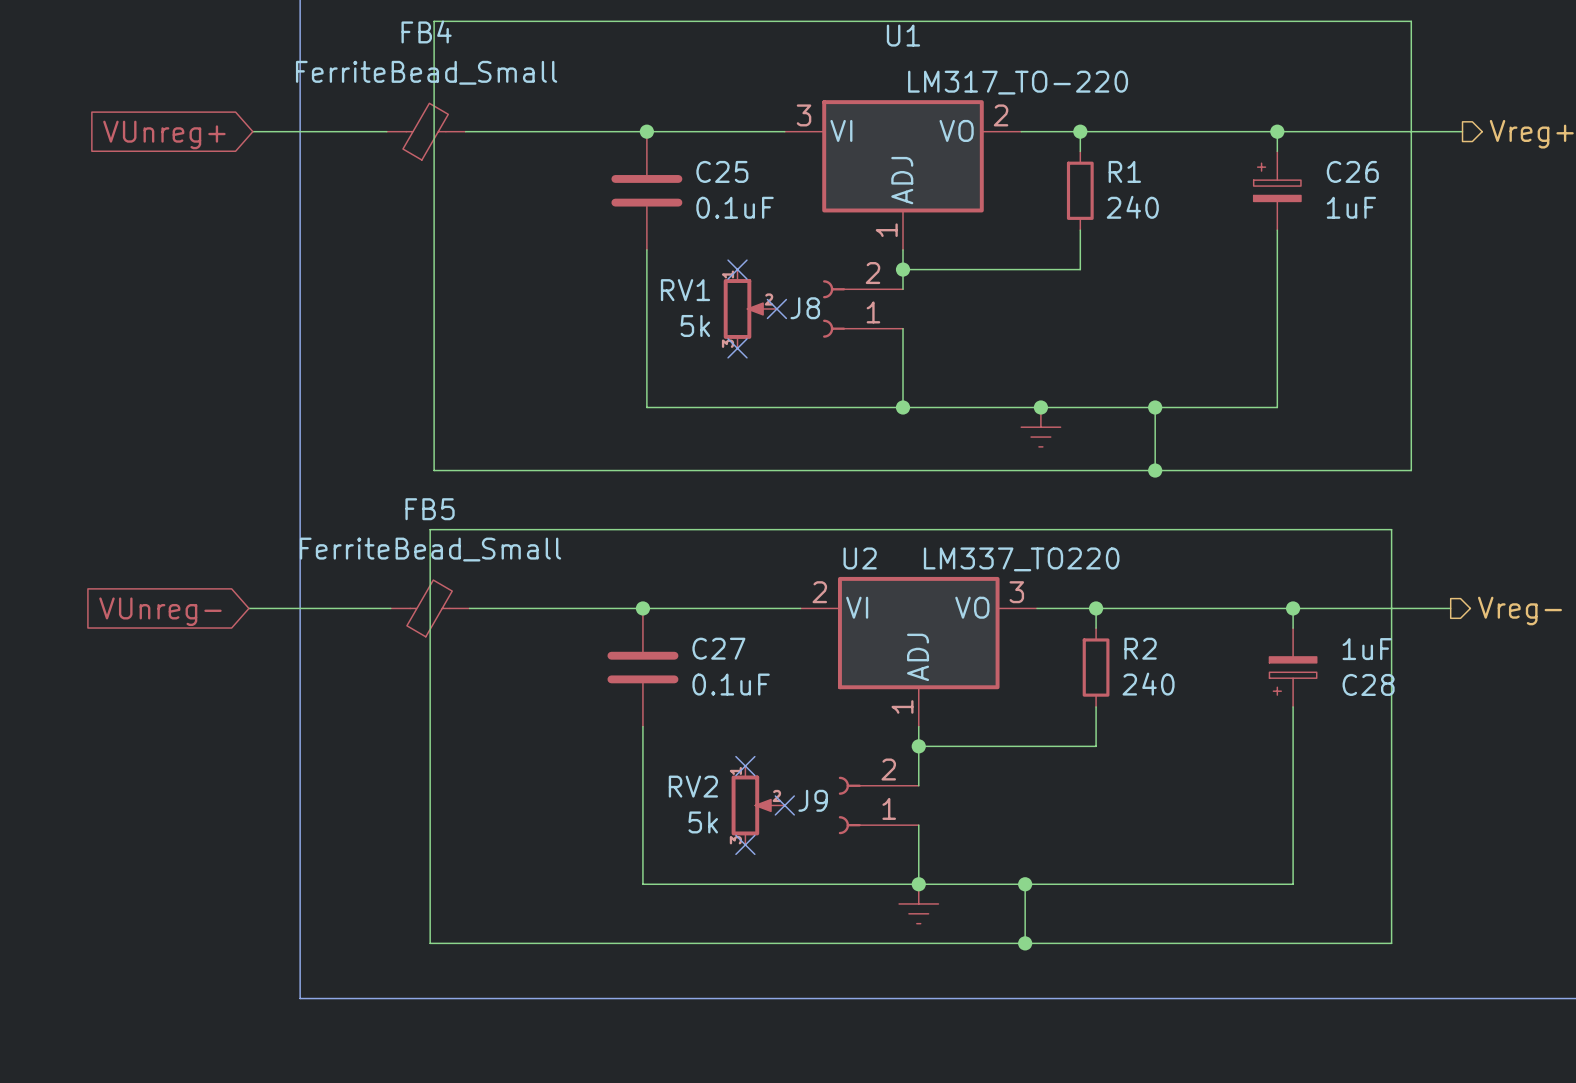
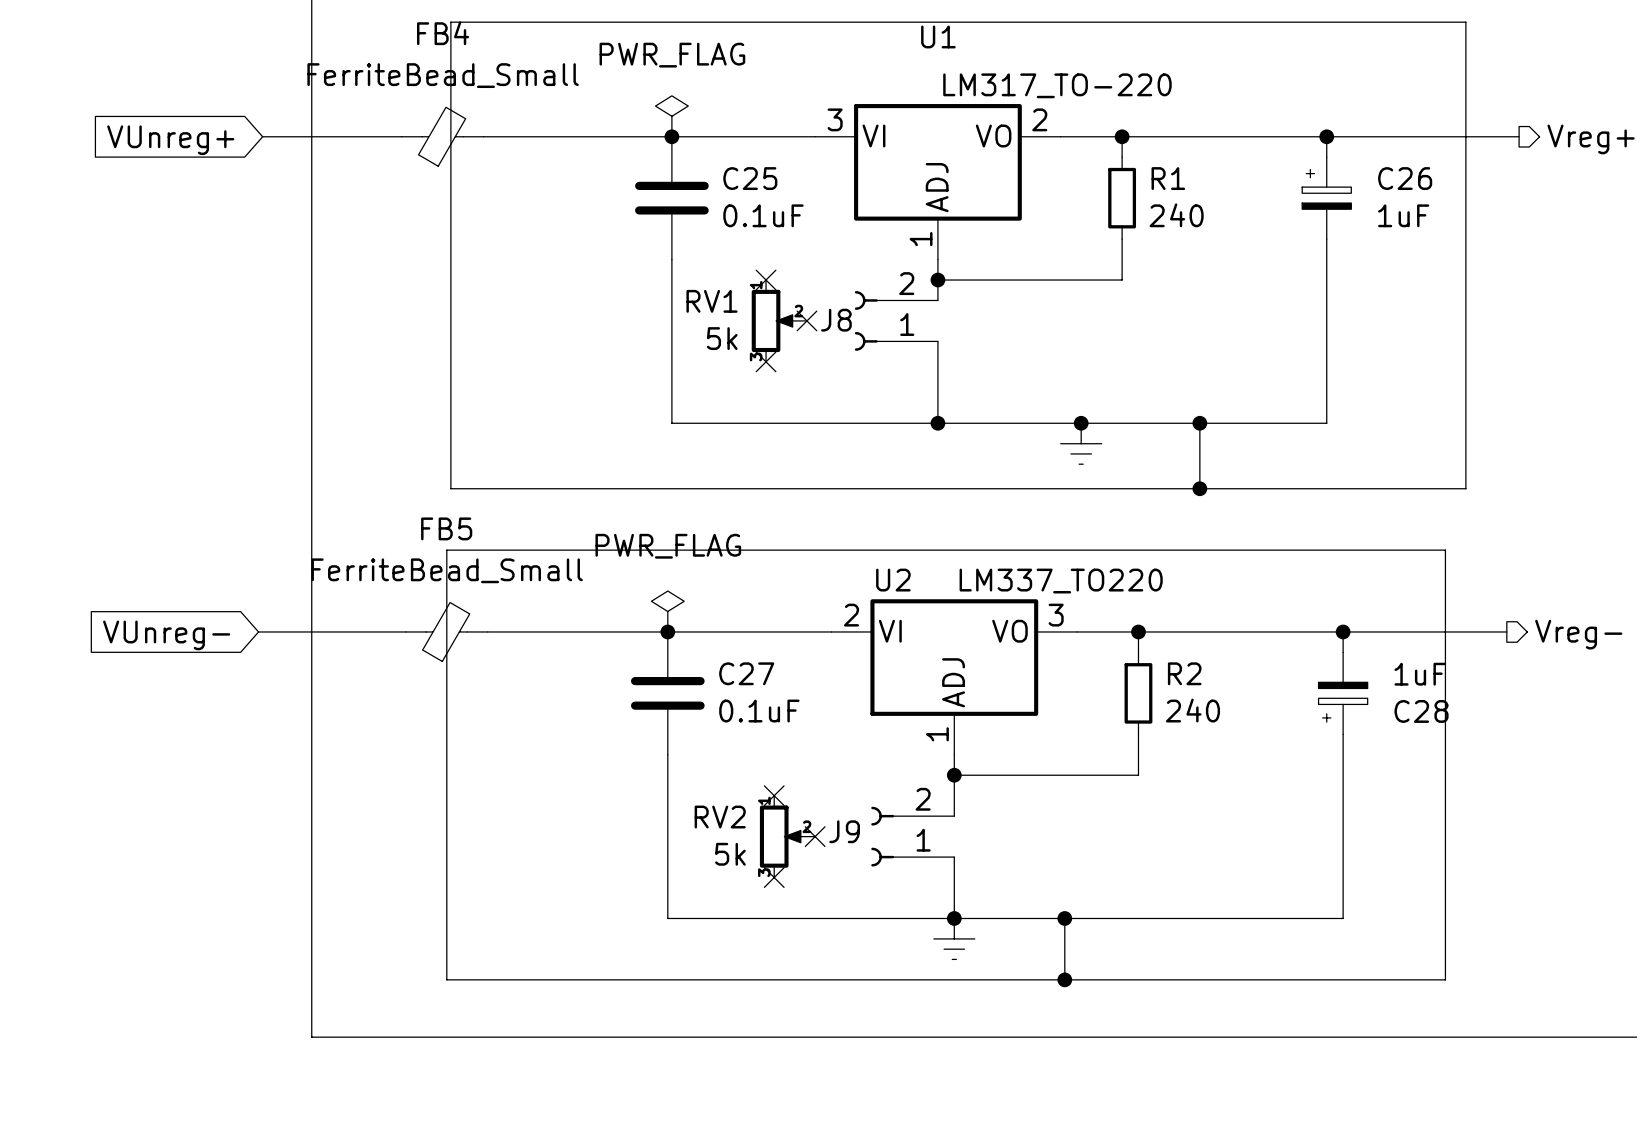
power symbol: none -> PWR_FLAG (671, 116)
power symbol: none -> PWR_FLAG (667, 611)

